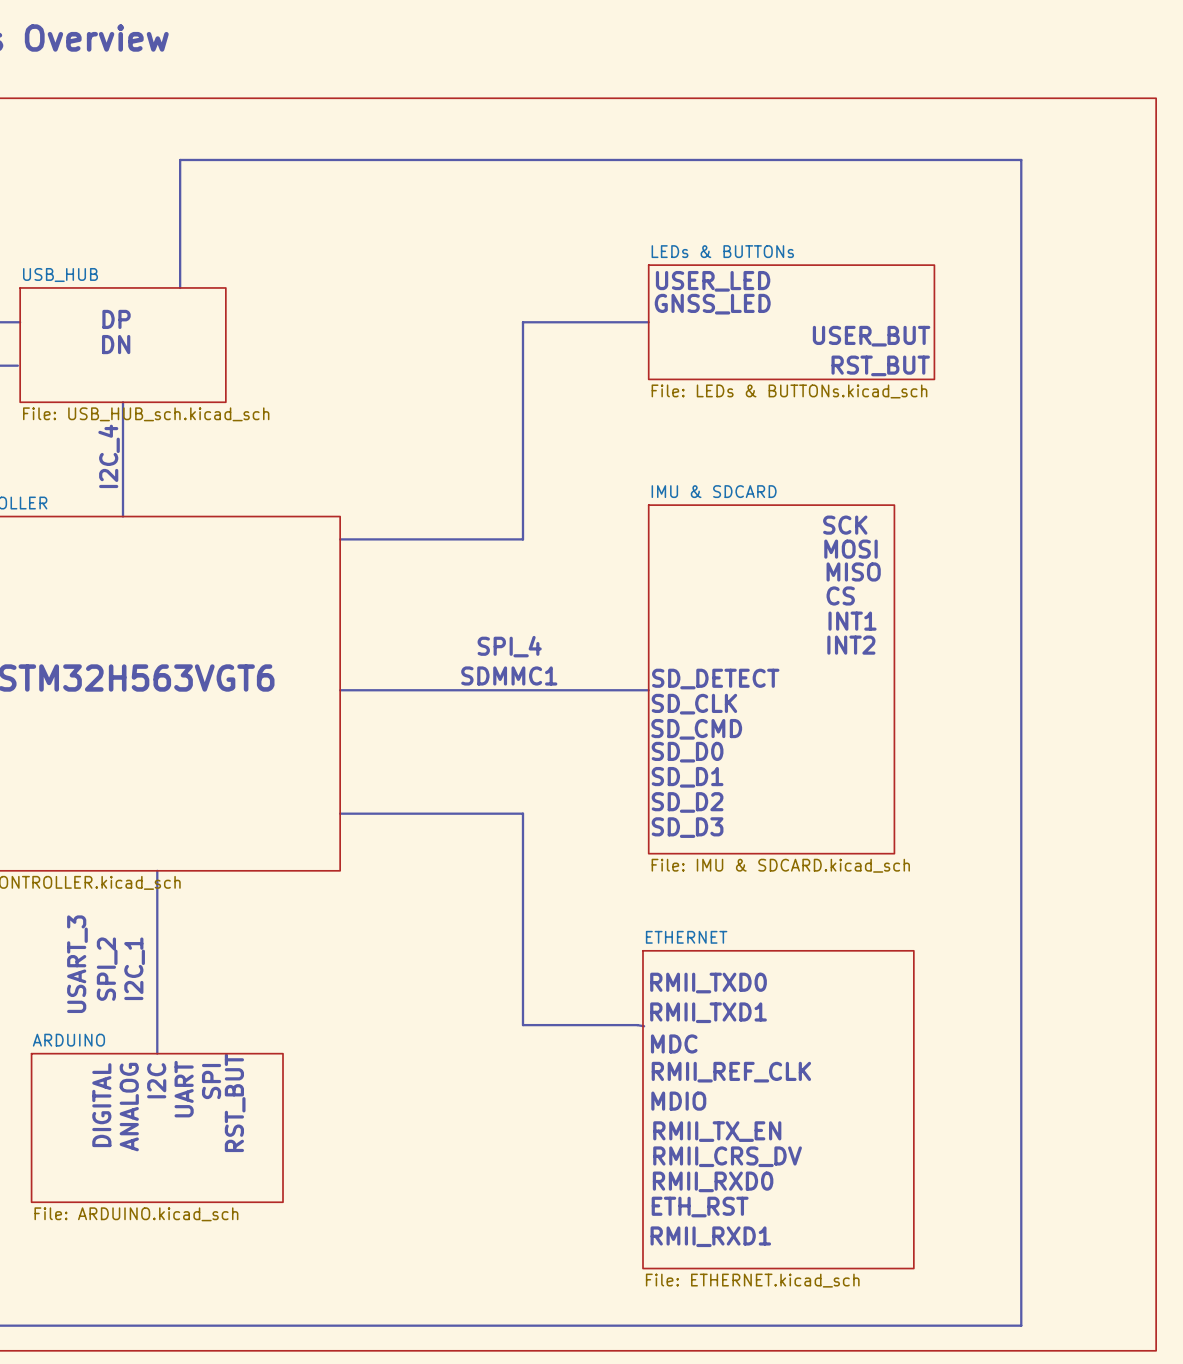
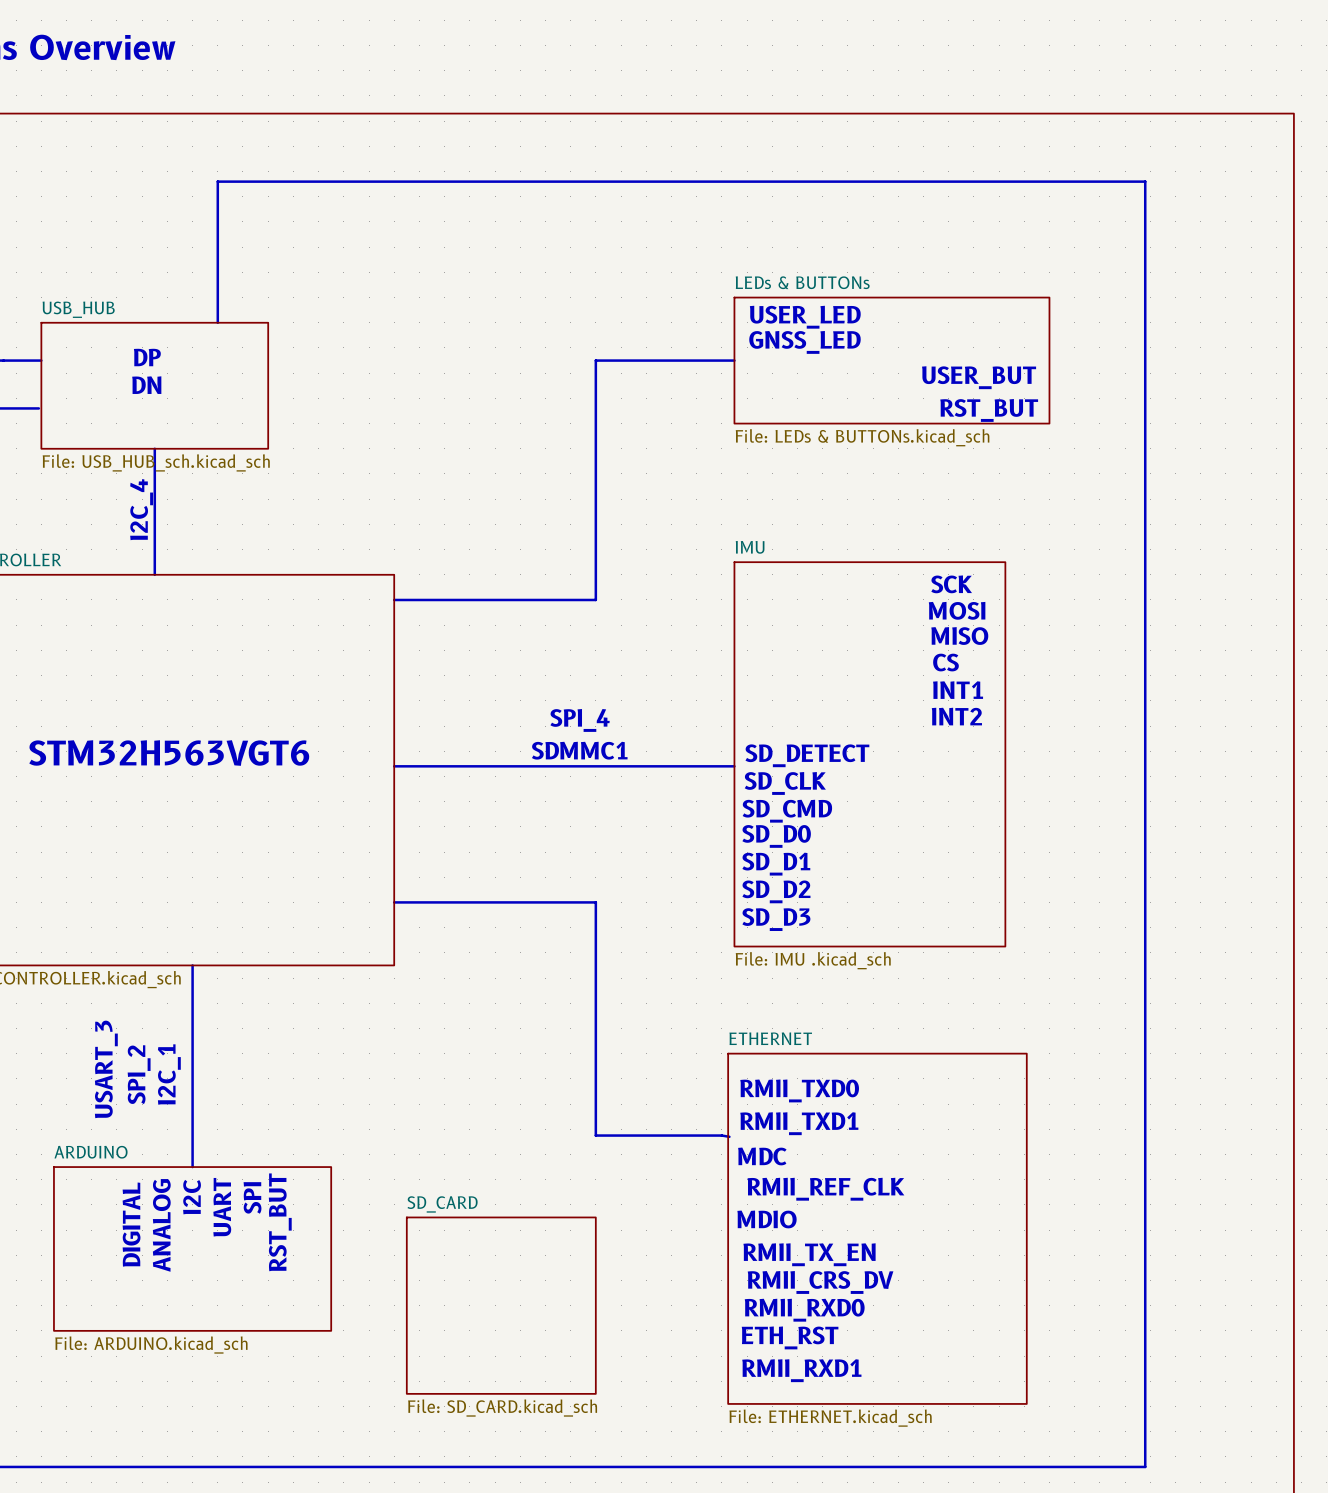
sheet IMU & SDCARD name: IMU & SDCARD (714, 491) -> IMU (750, 547)
sheet IMU & SDCARD value: File: IMU & SDCARD.kicad_sch (780, 865) -> File: IMU .kicad_sch (813, 960)
sheet SD_CARD: none -> File: SD_CARD.kicad_sch (501, 1305)

